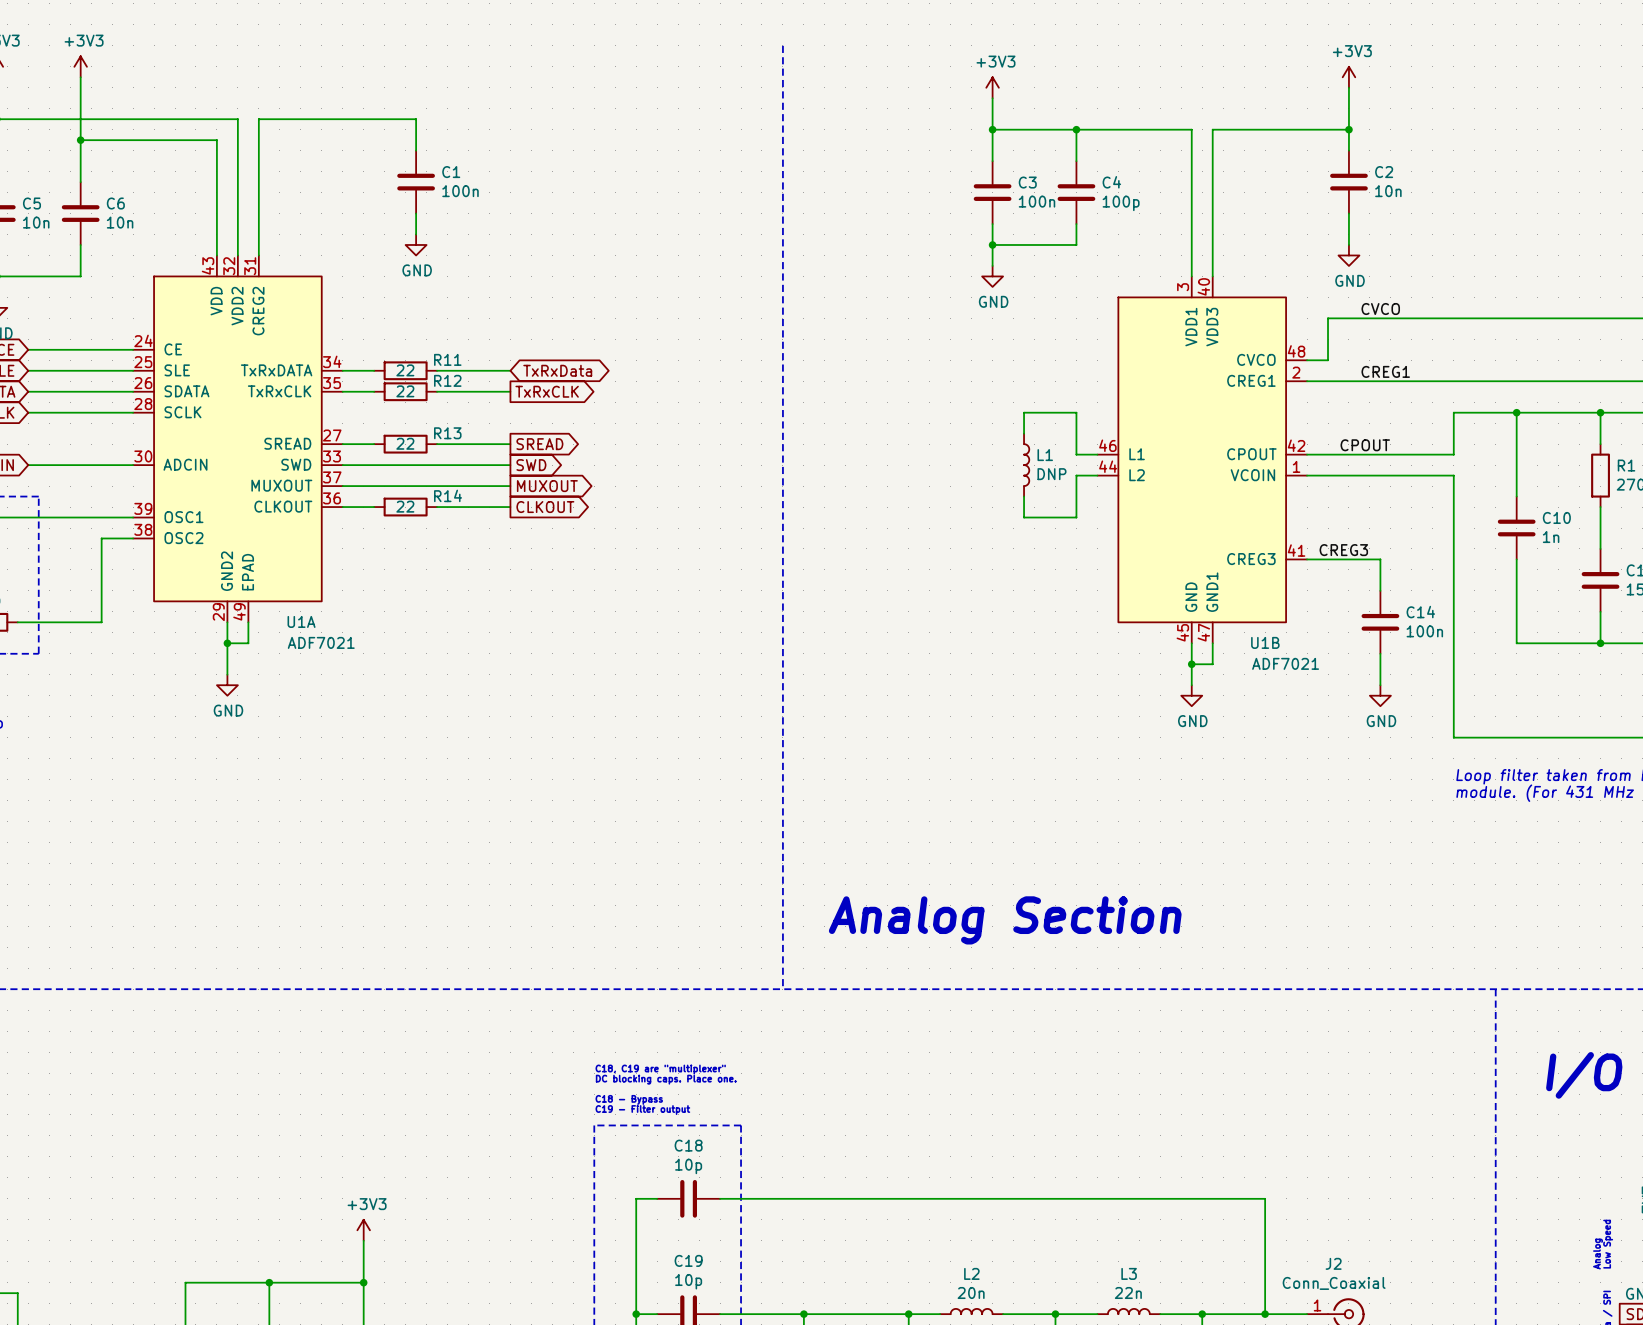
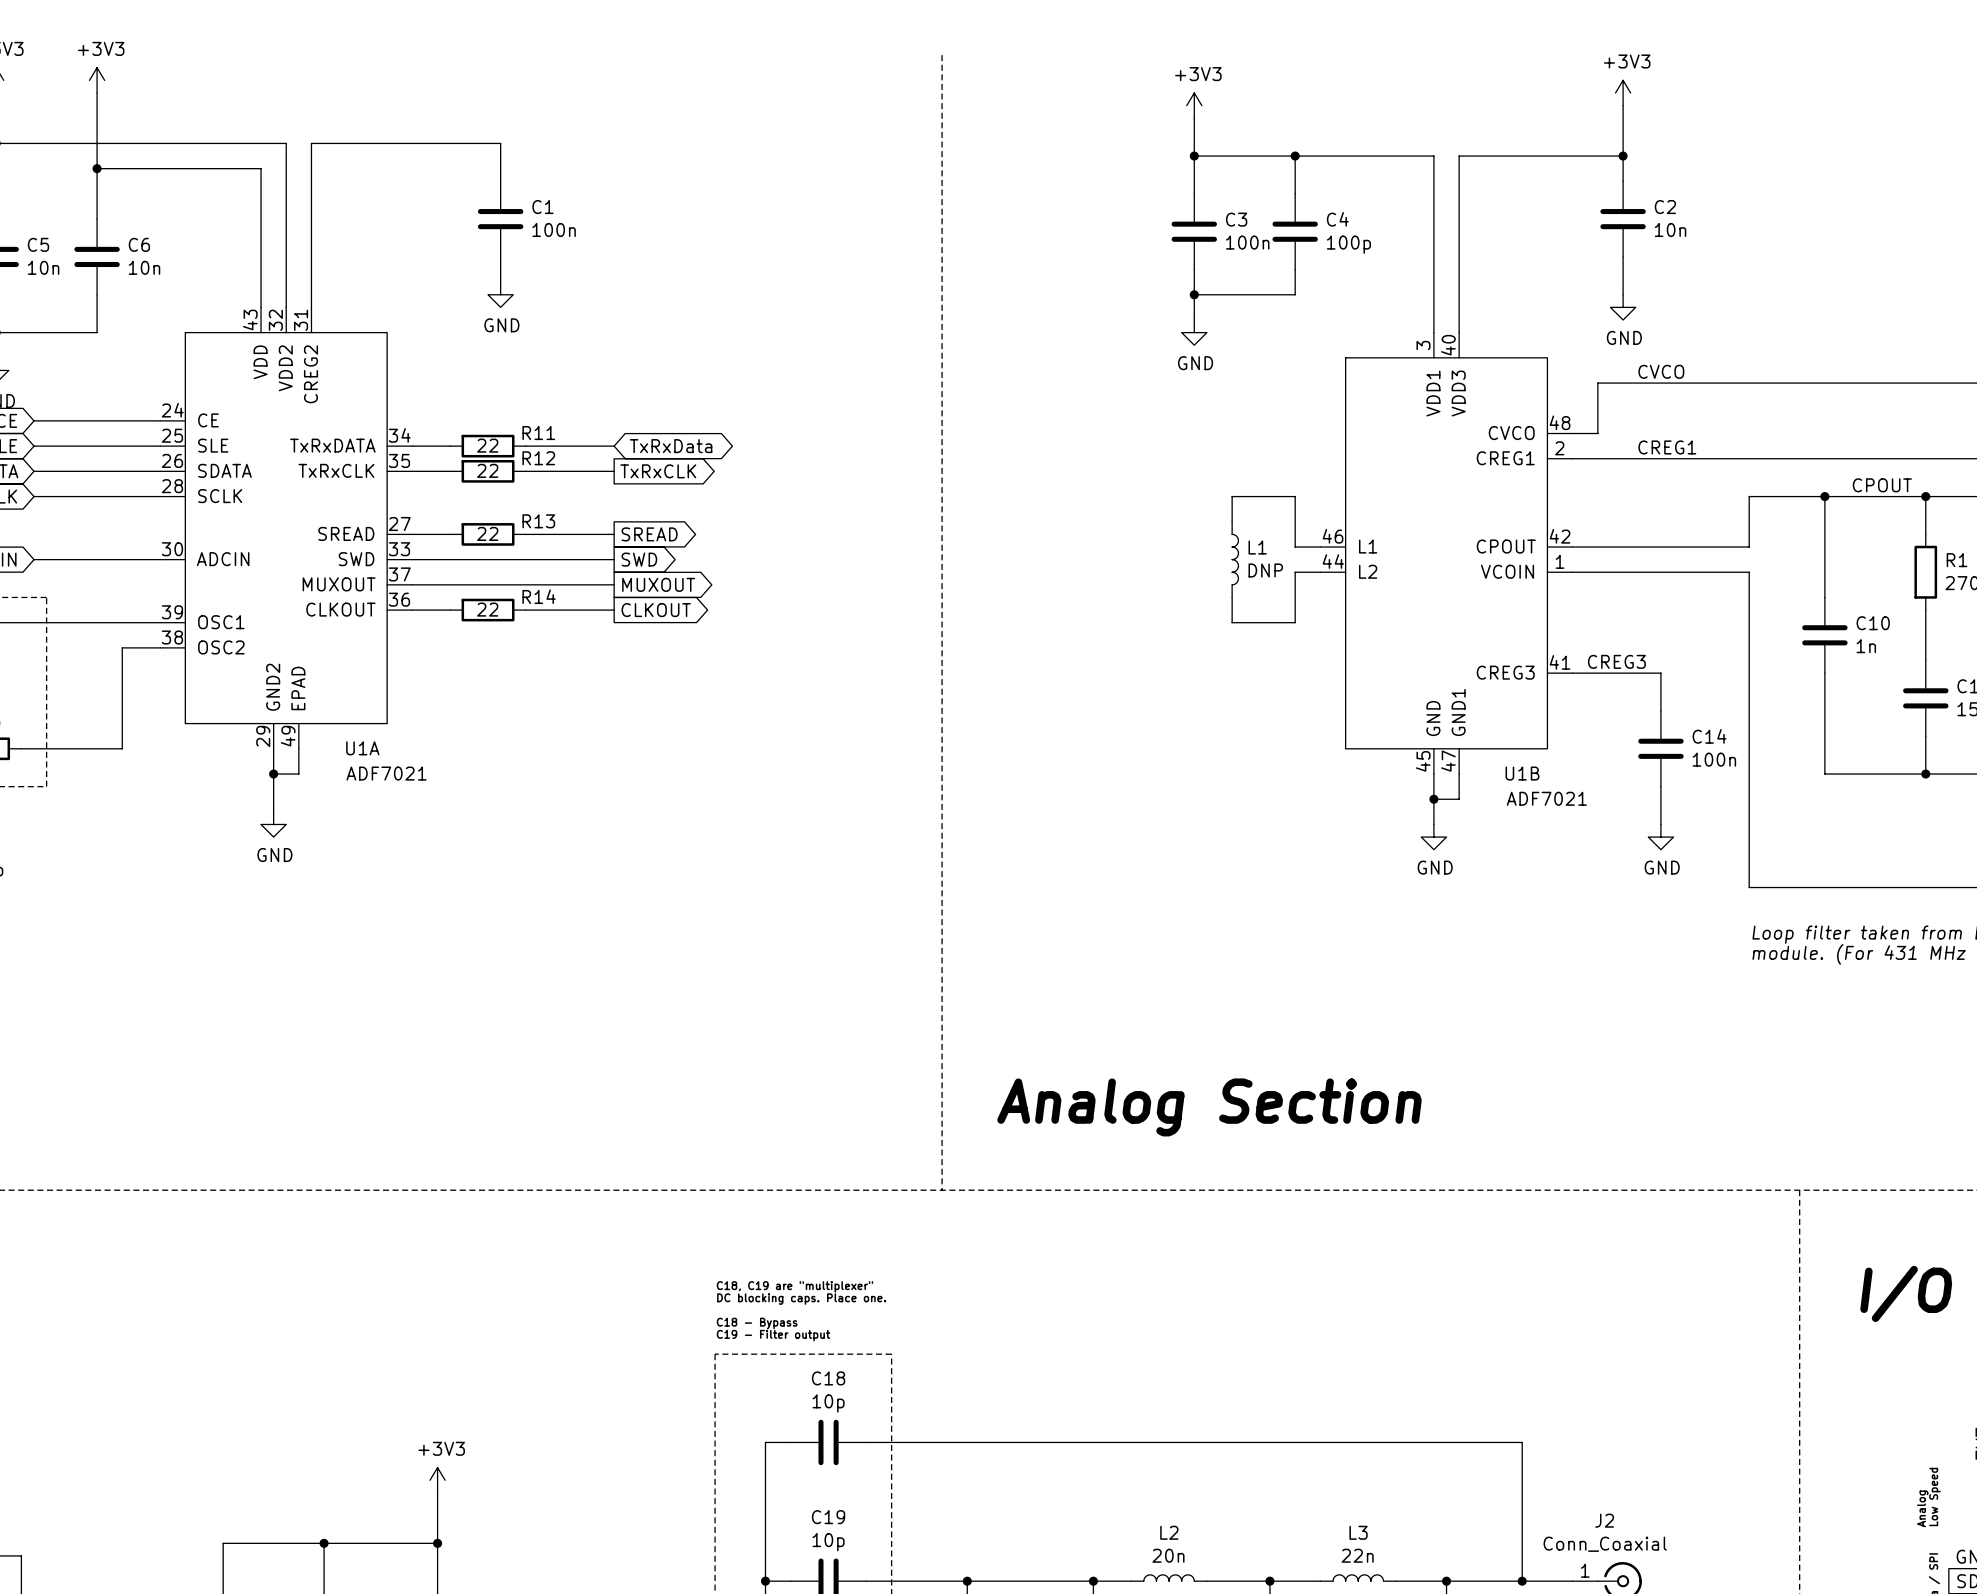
label position: CPOUT (1365, 445) -> CPOUT (1882, 485)

